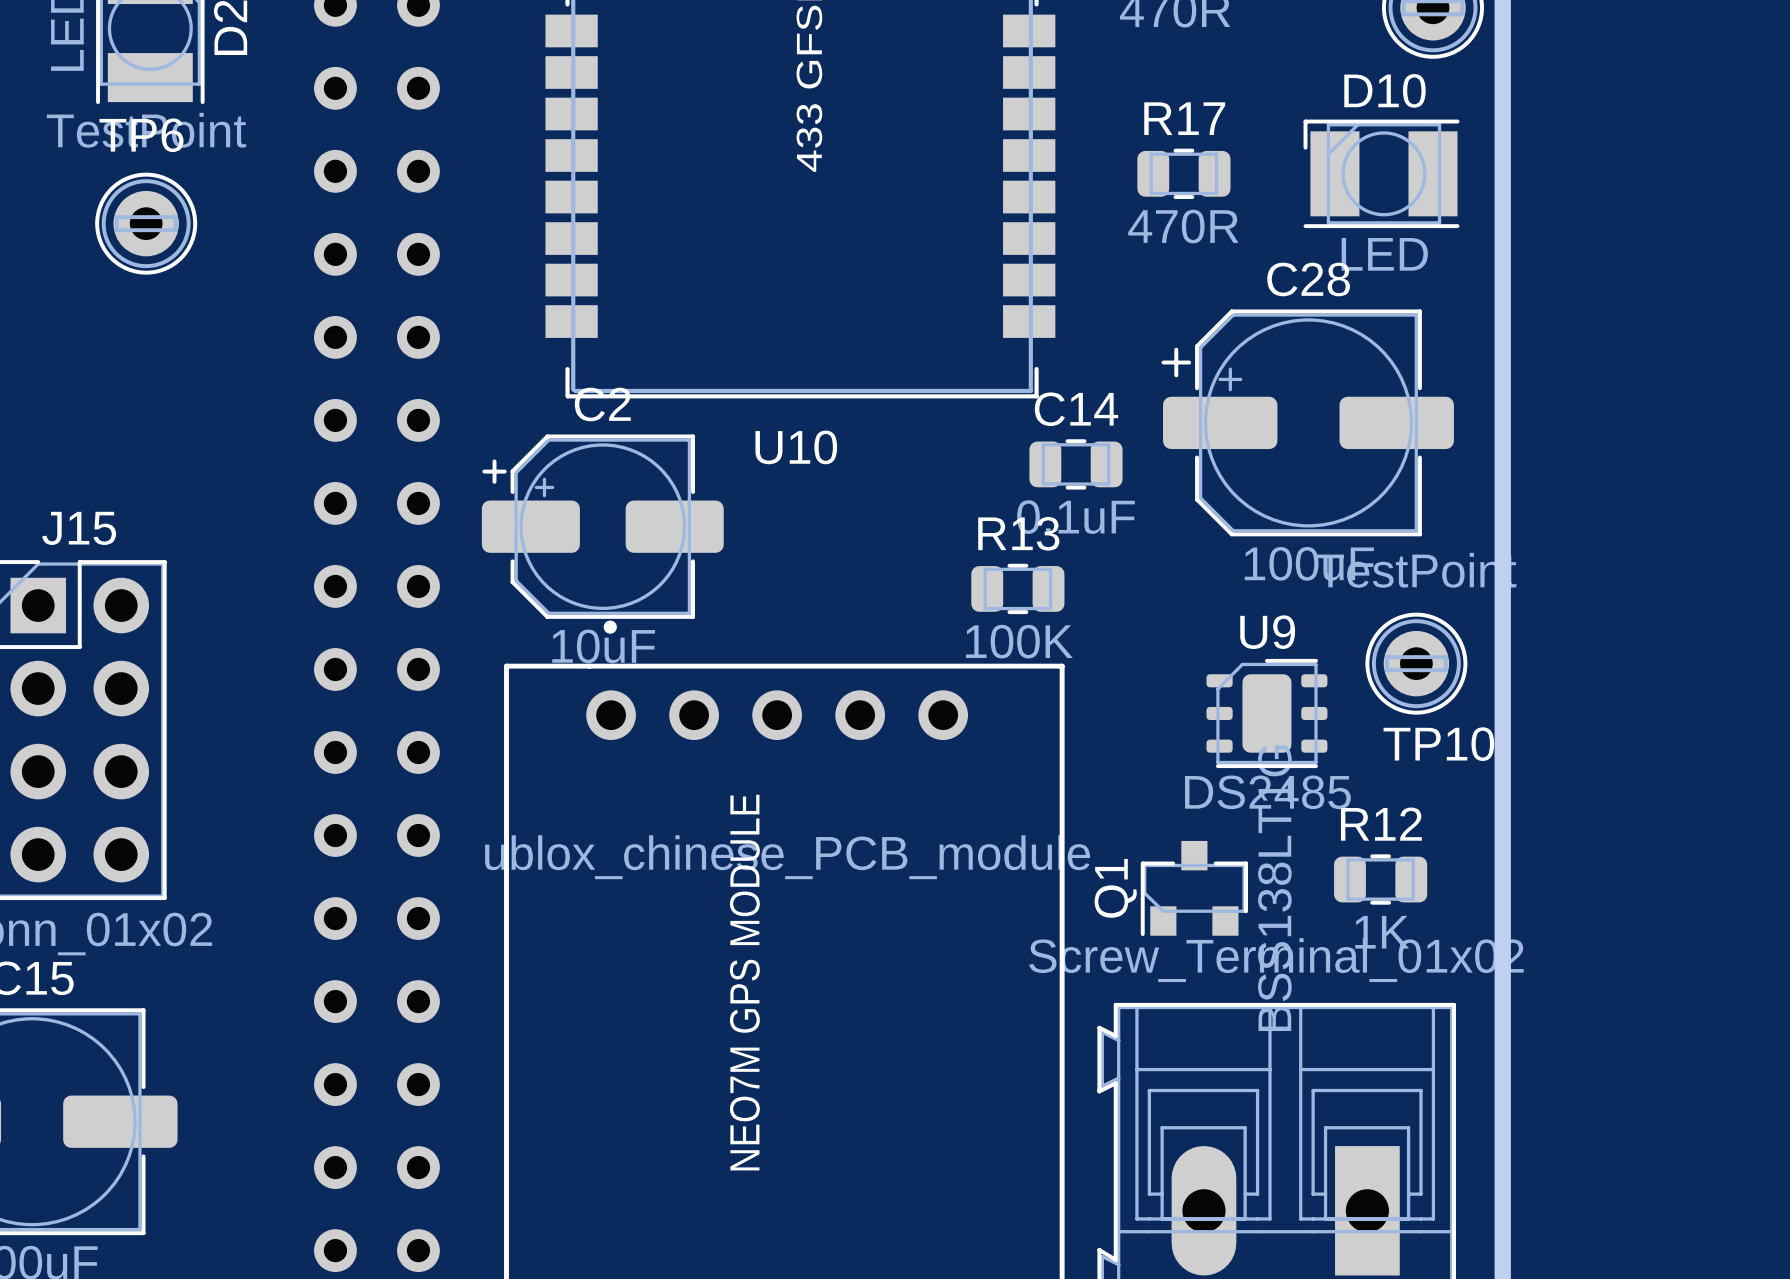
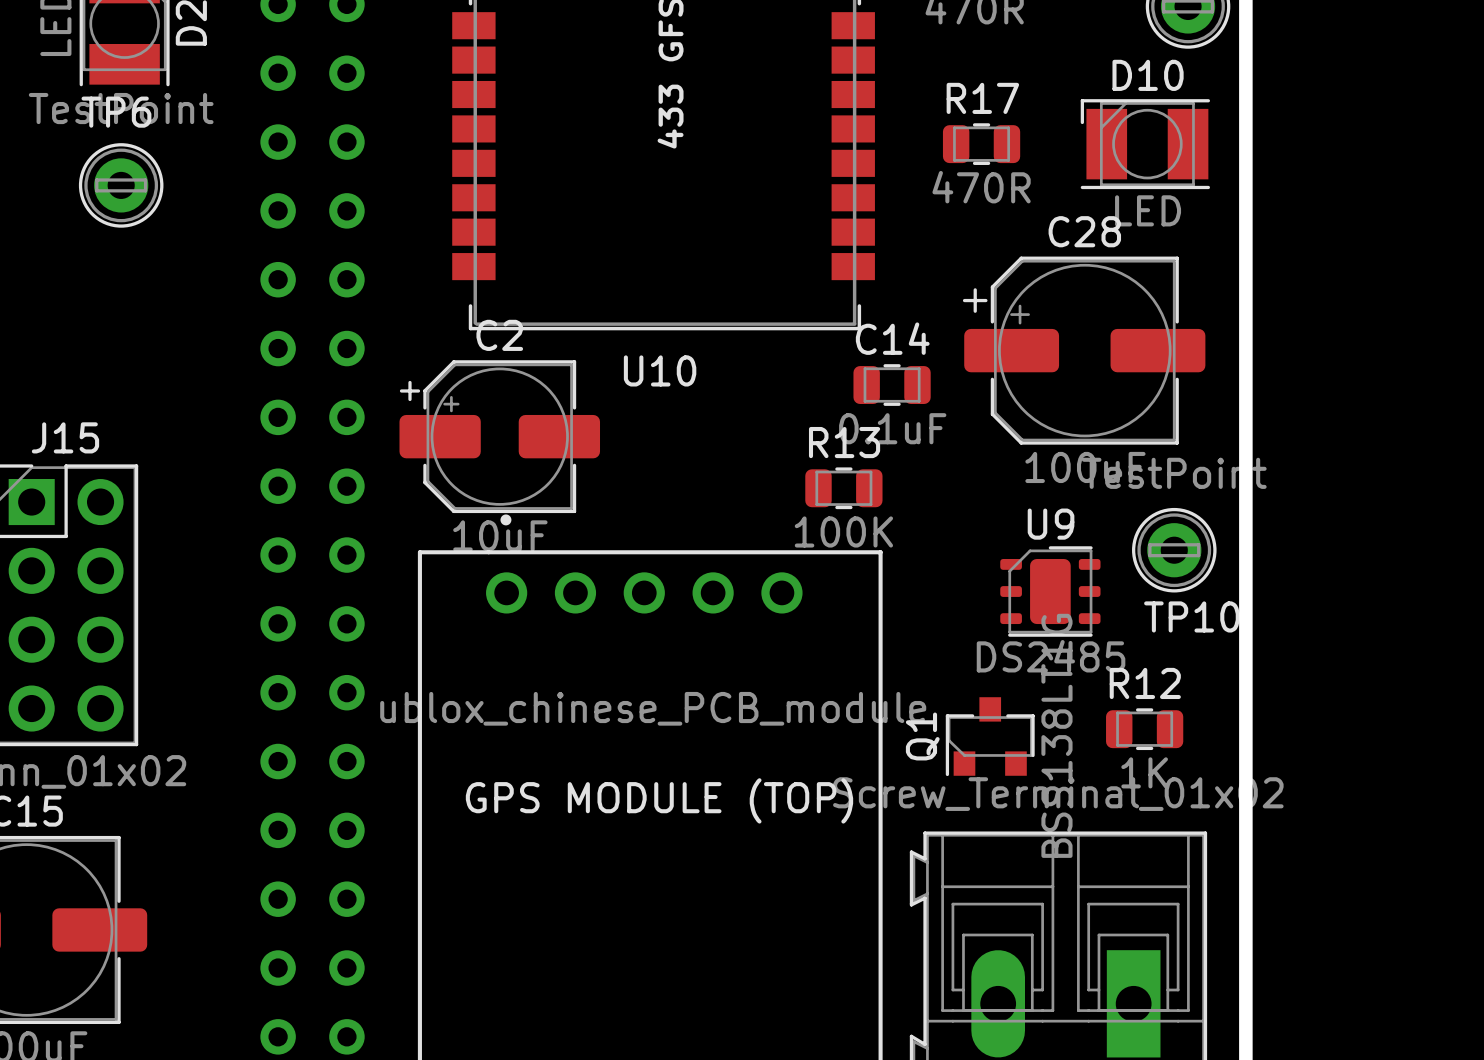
part text: none -> GPS MODULE (TOP) (659, 800)
part text: NEO7M GPS MODULE (744, 982) -> none

